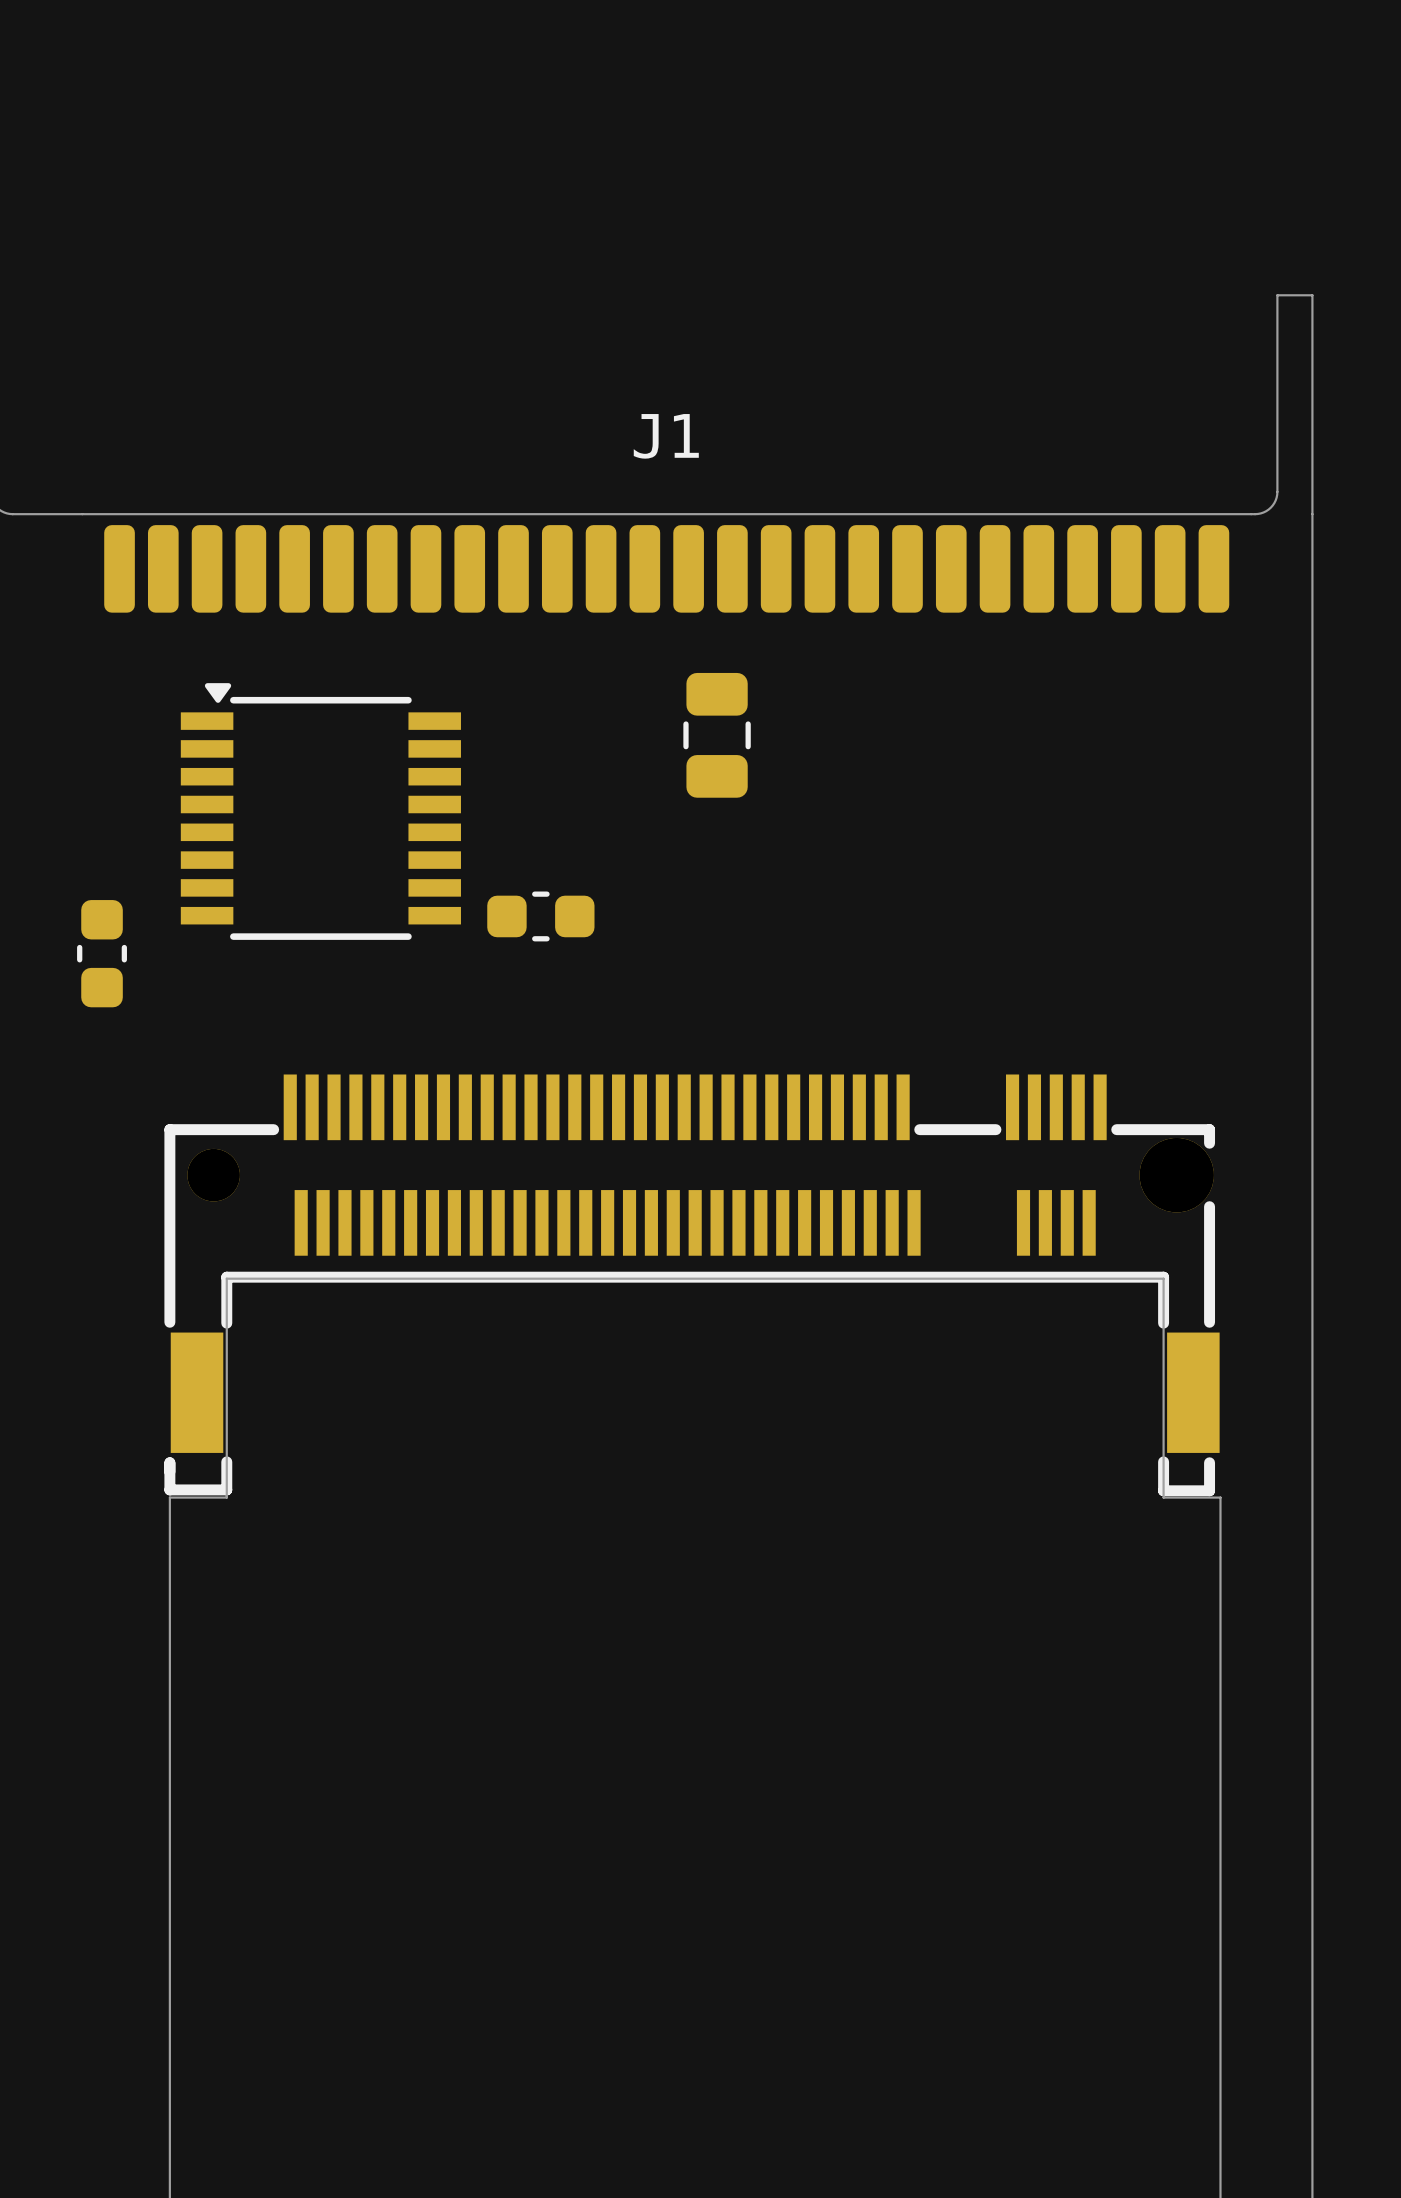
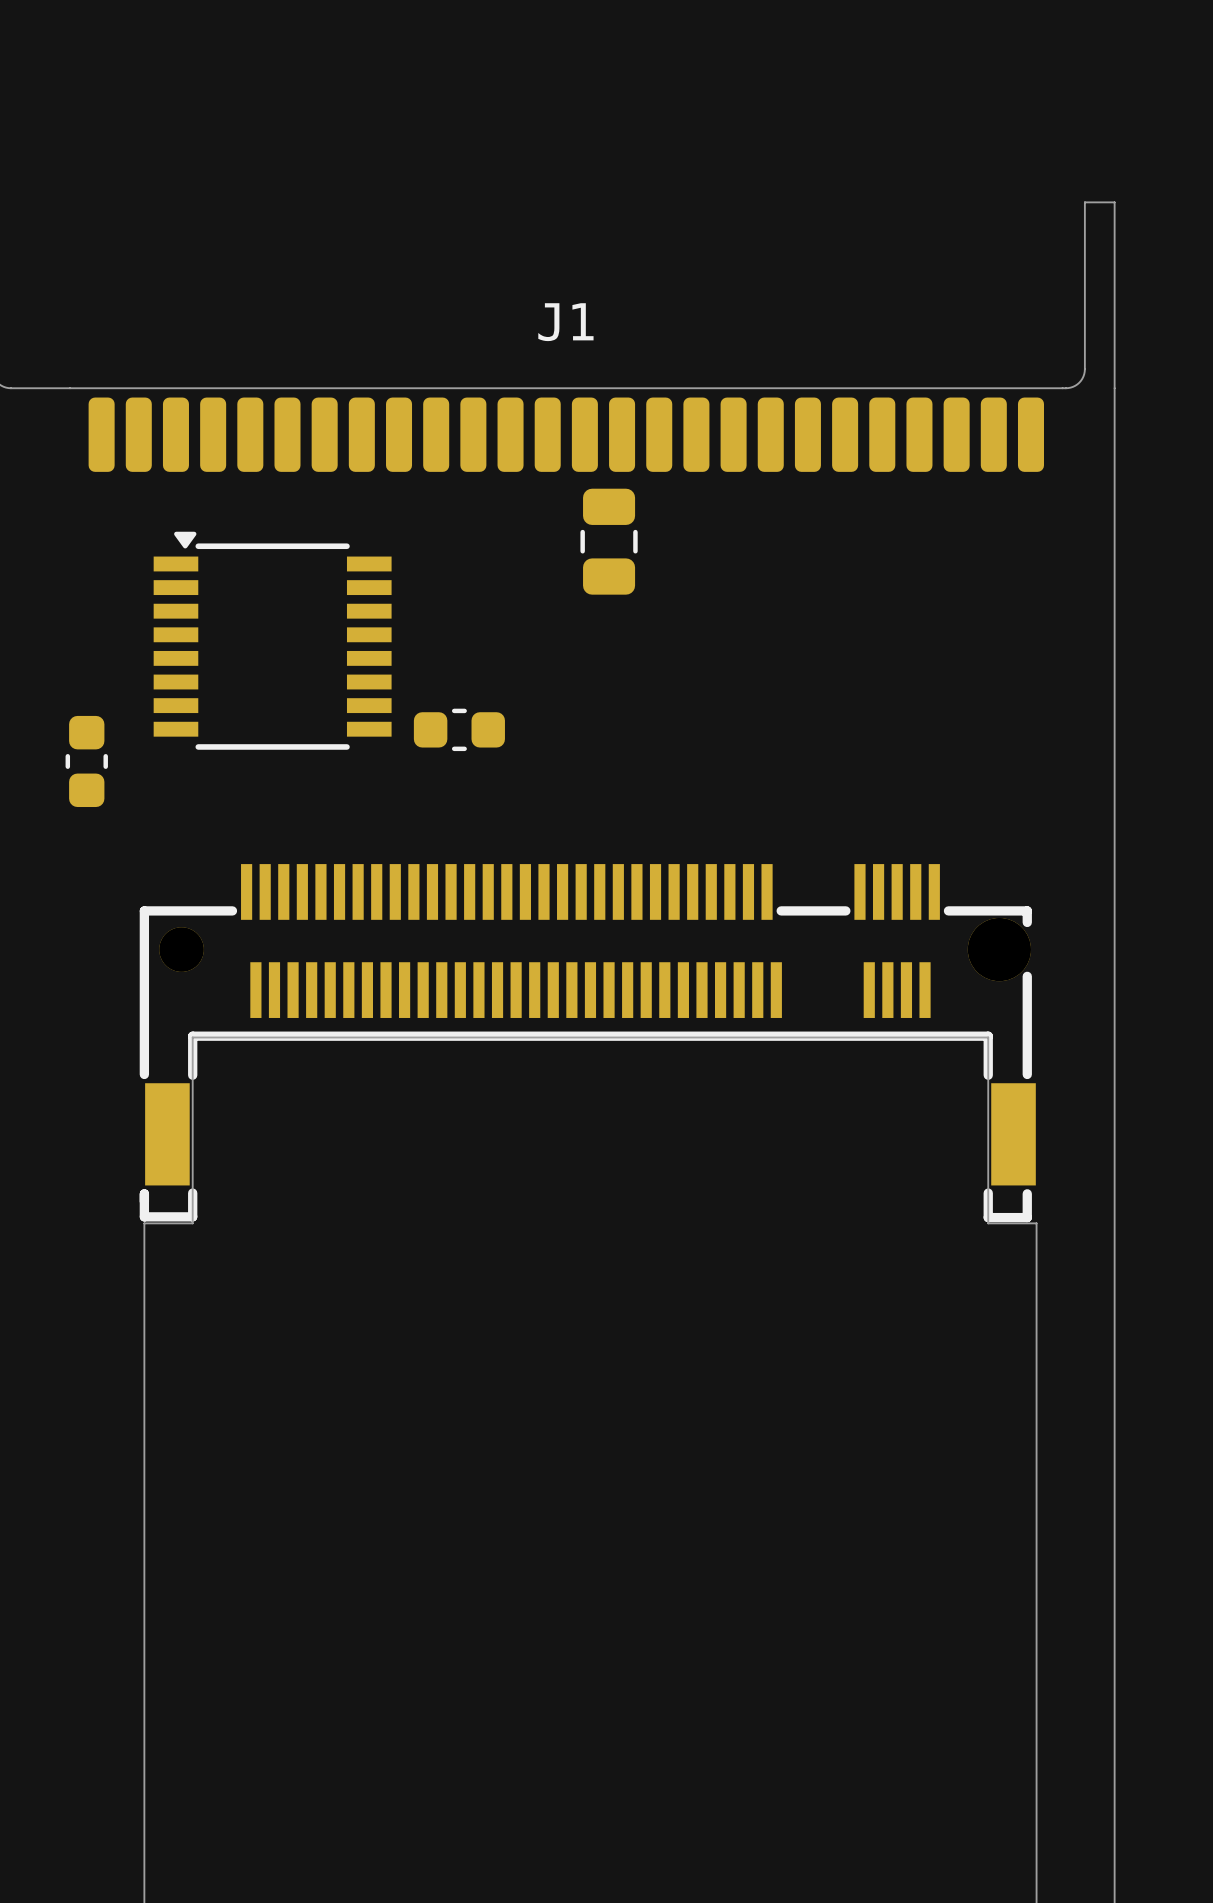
part position: (717, 735) -> (609, 541)

